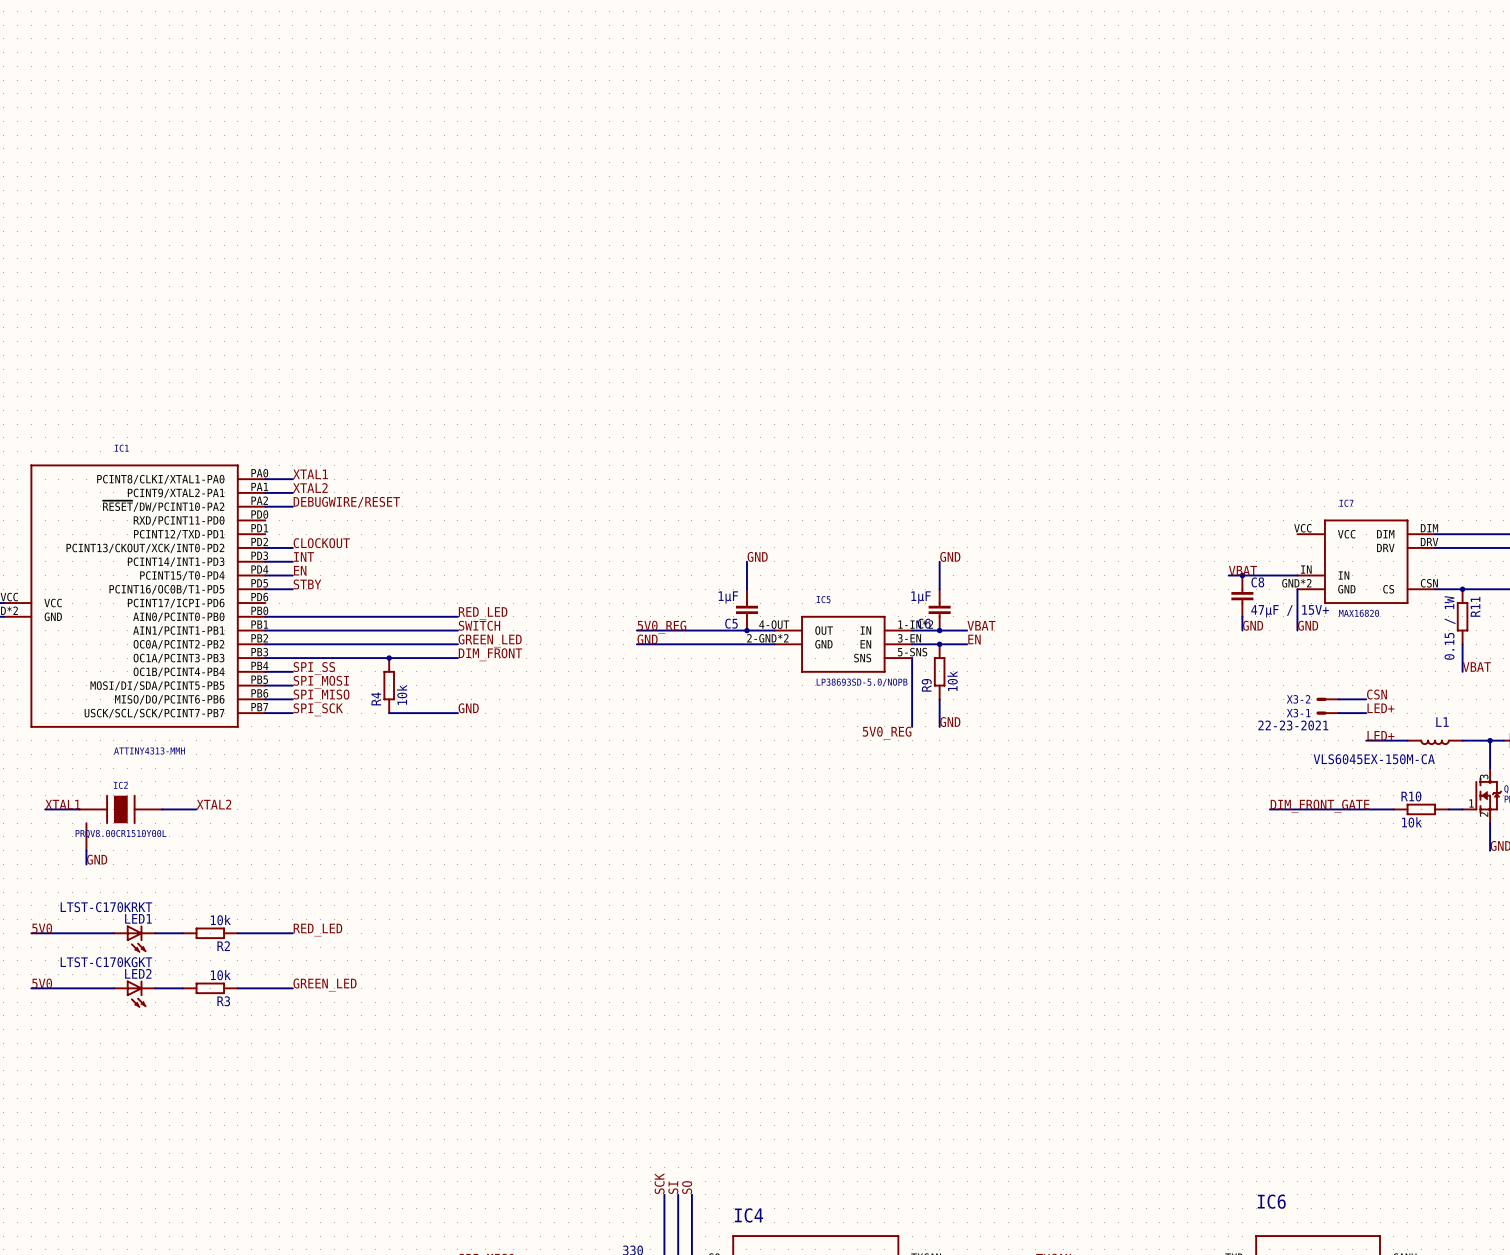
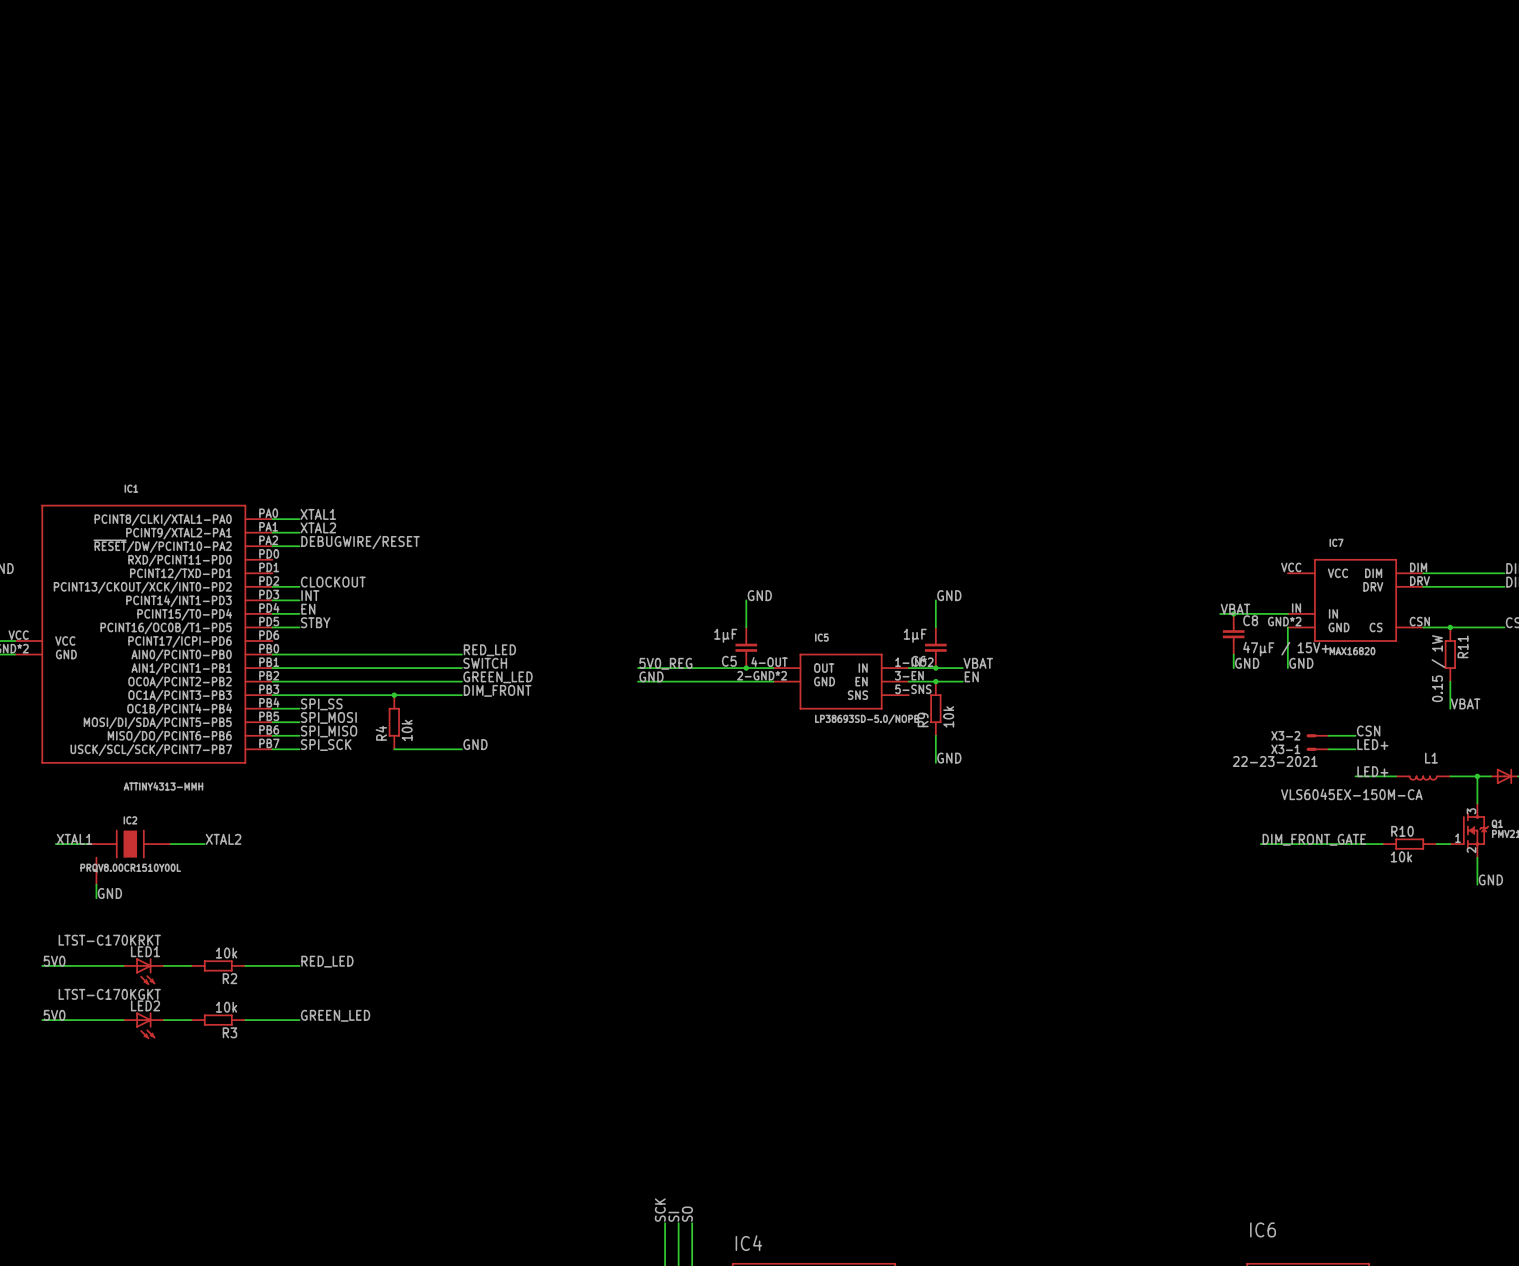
wire: (912, 658) (912, 726) -> none
label: 5V0_REG (887, 733) -> none

